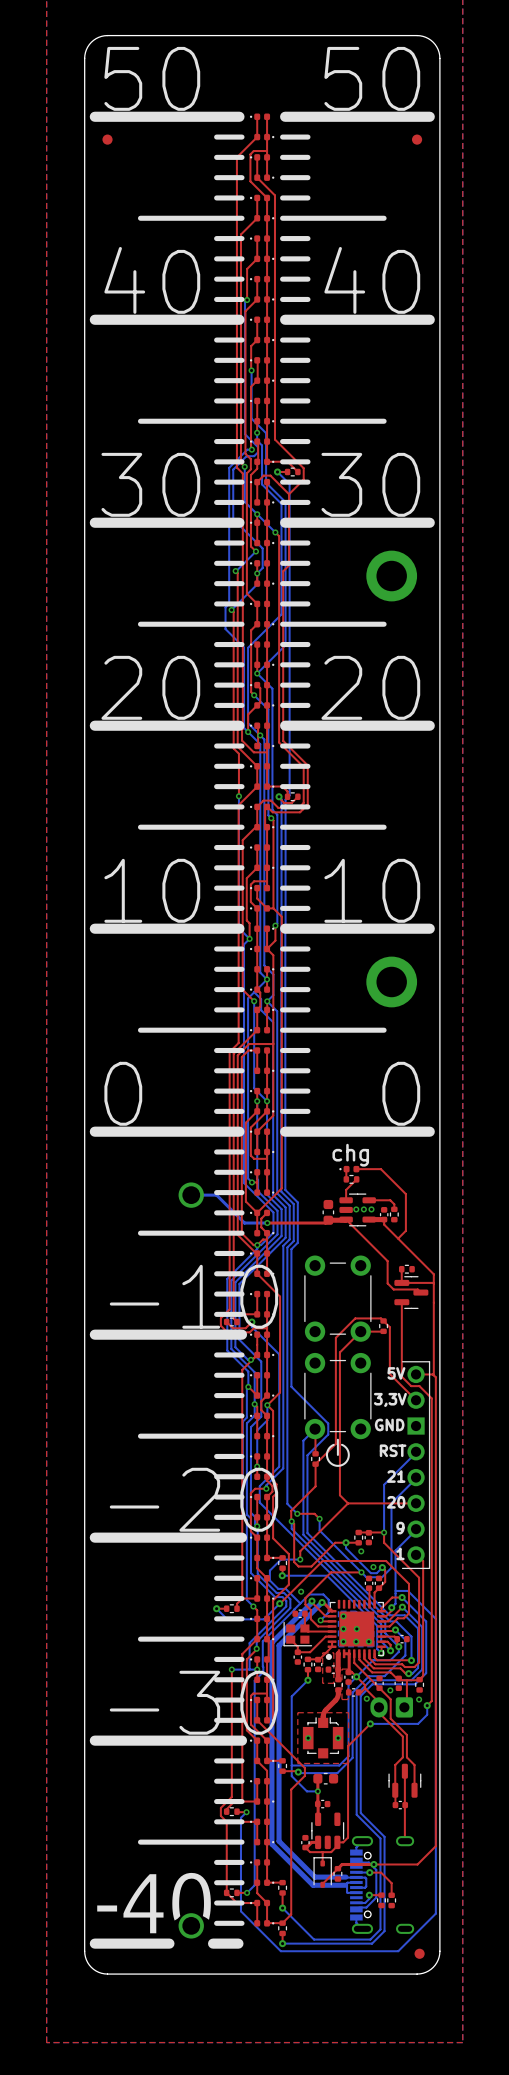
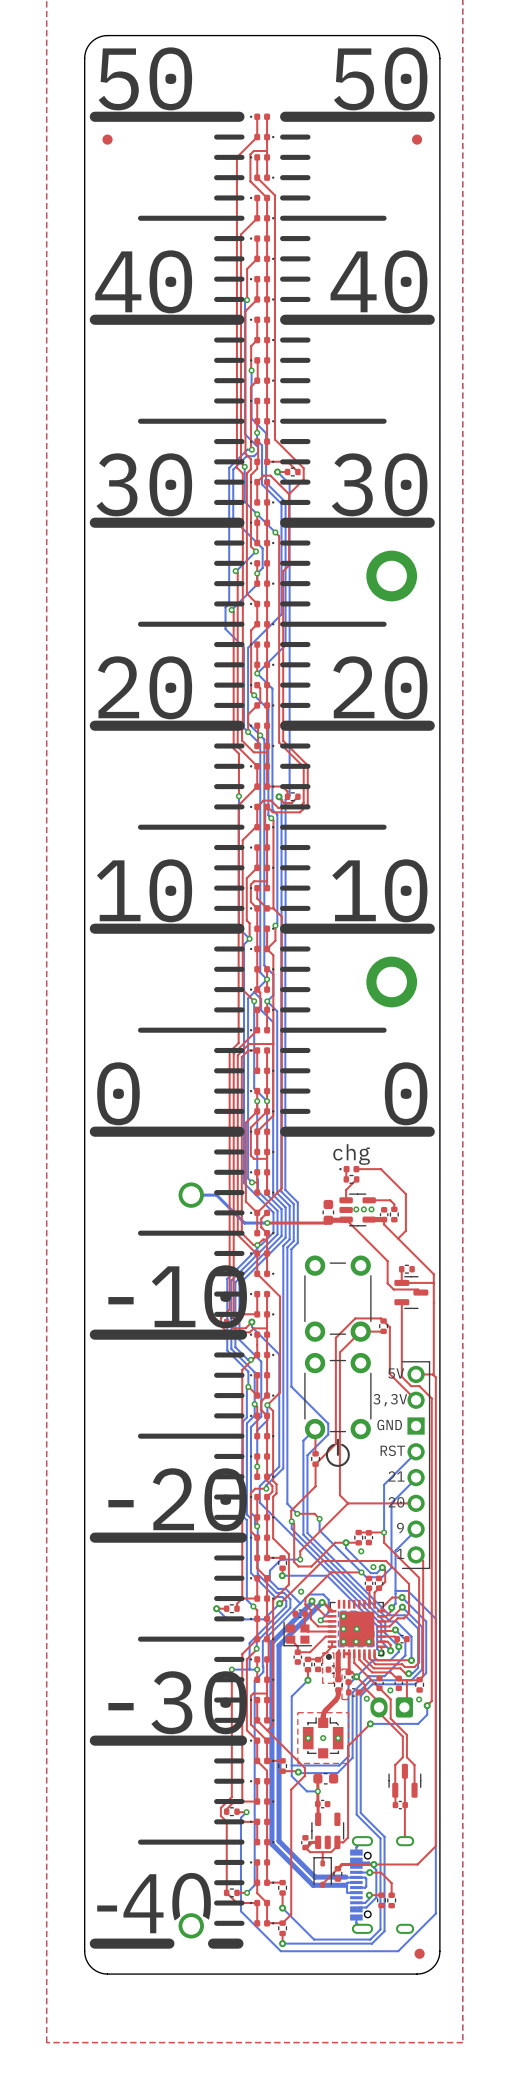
via: none -> (323, 1738)

